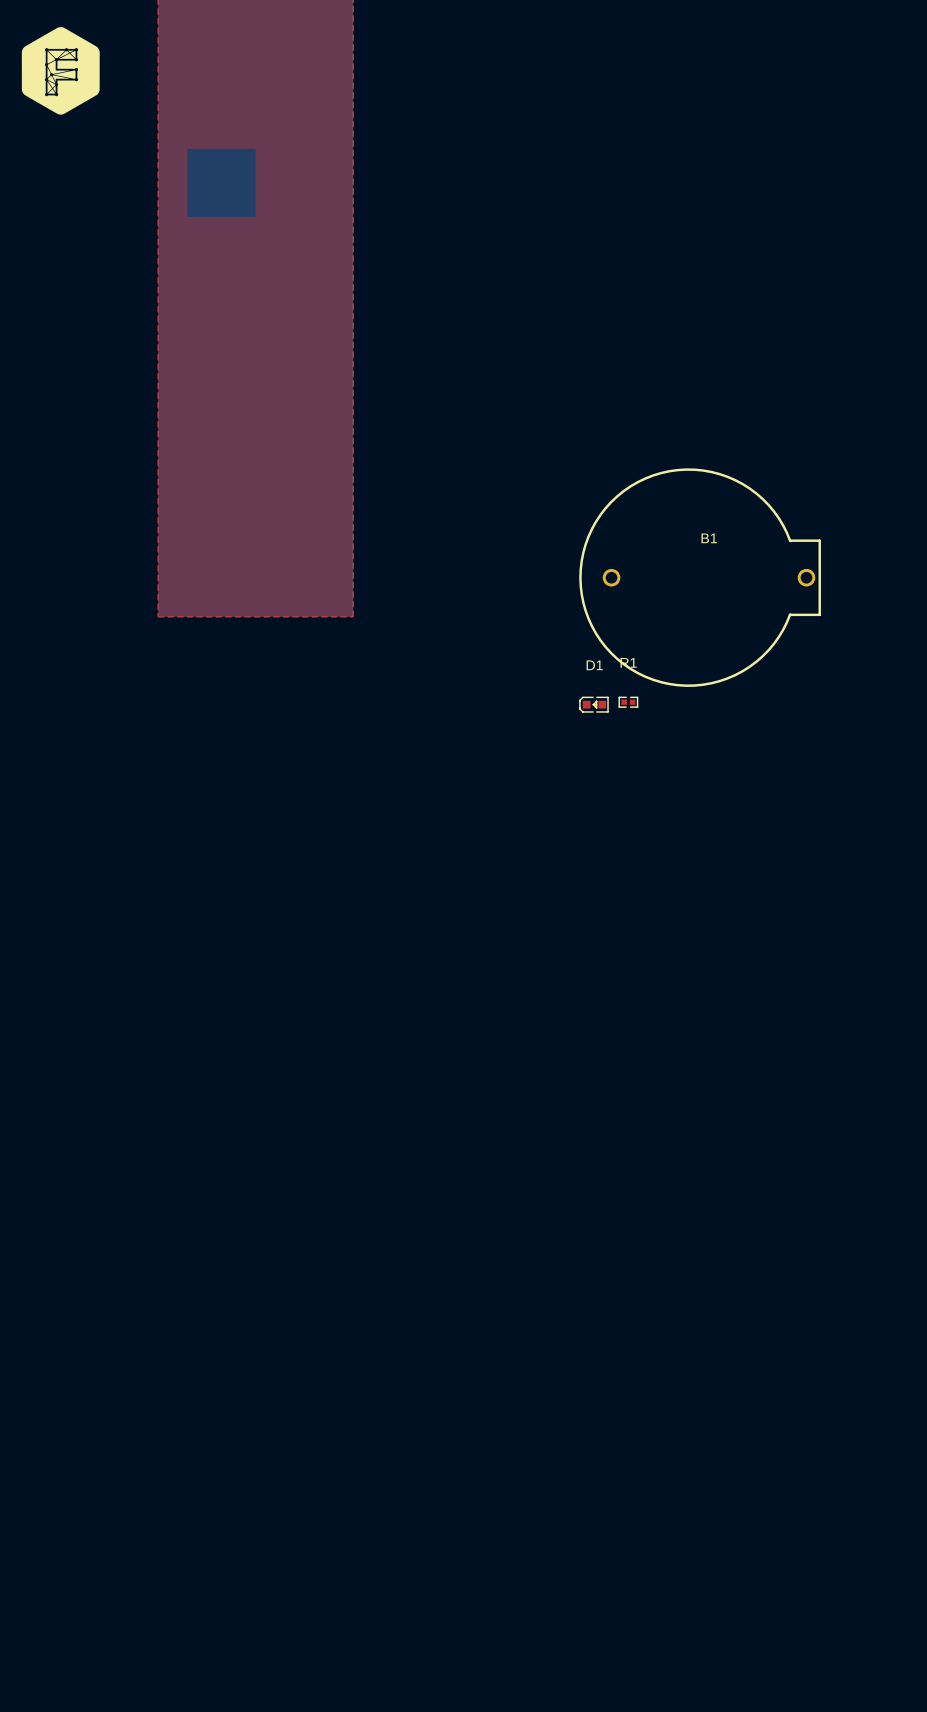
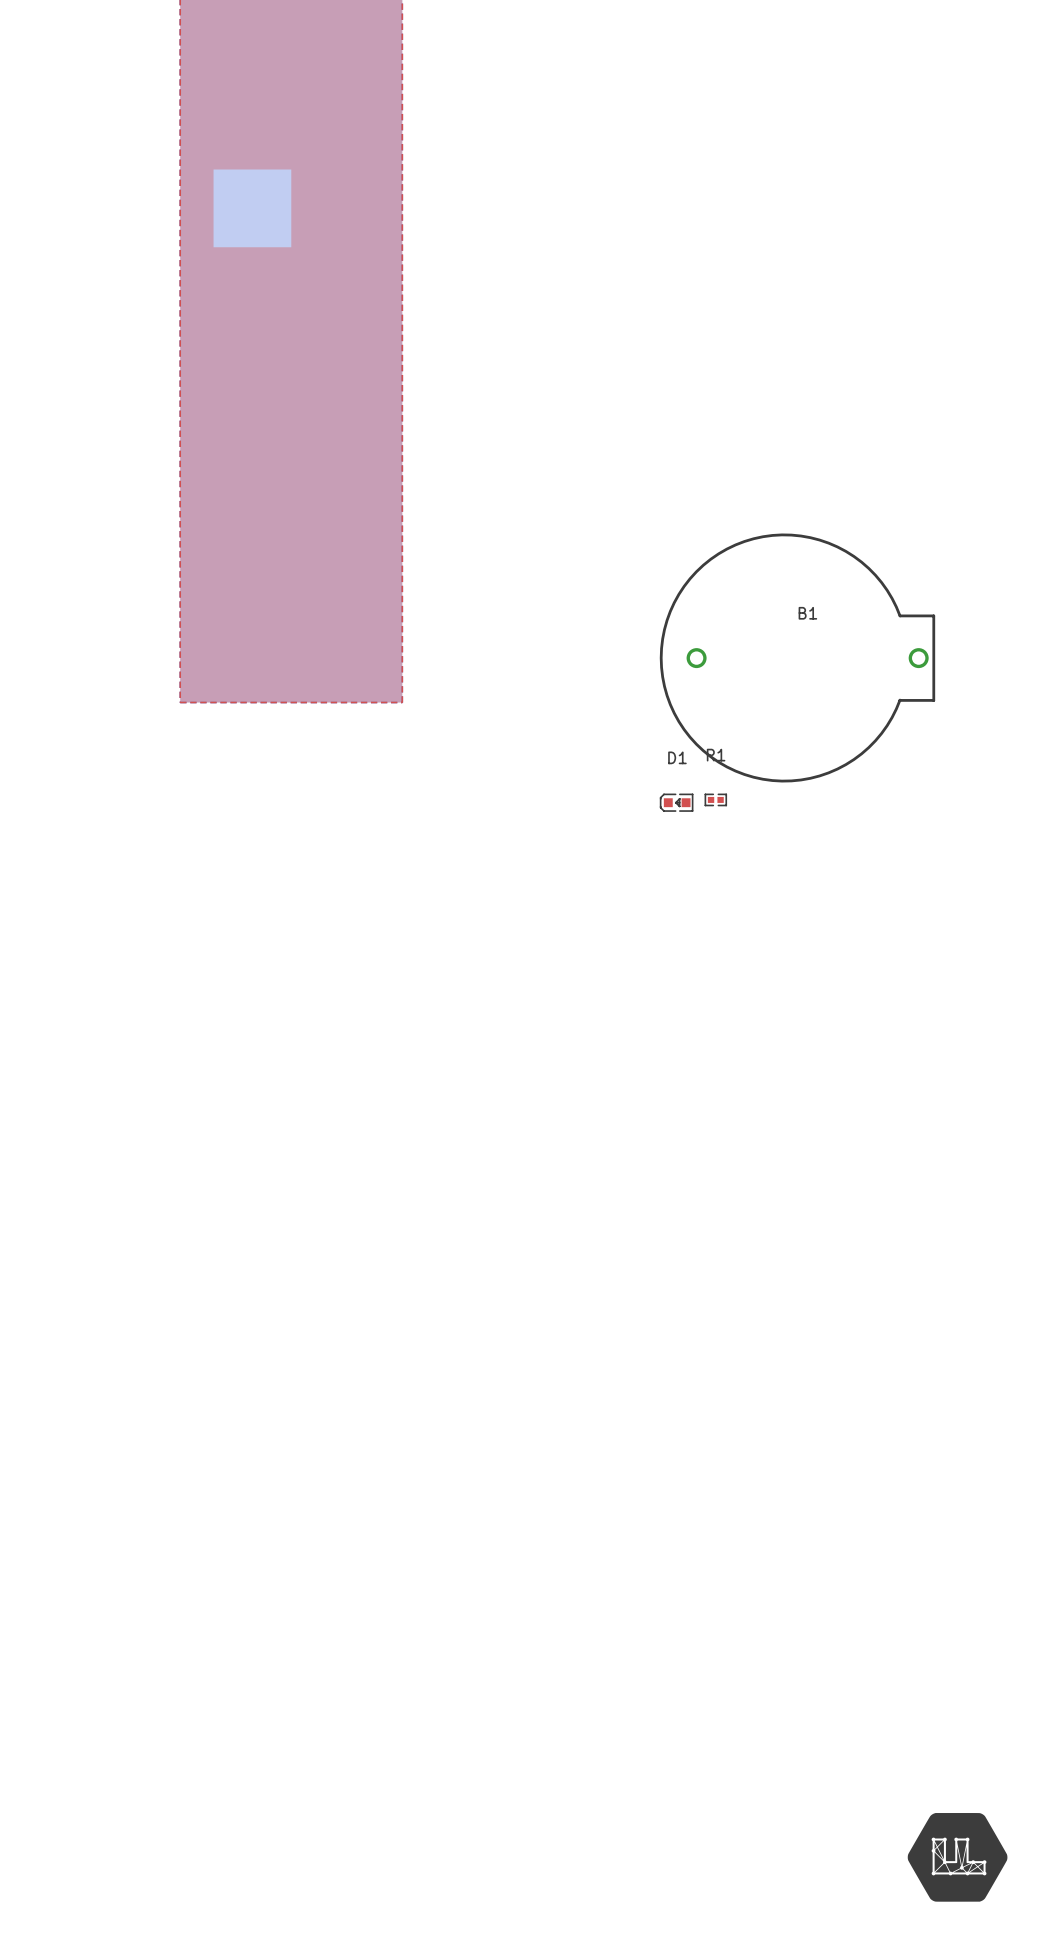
drawing: [21, 27, 100, 115] -> none
drawing: none -> [907, 1813, 1008, 1902]

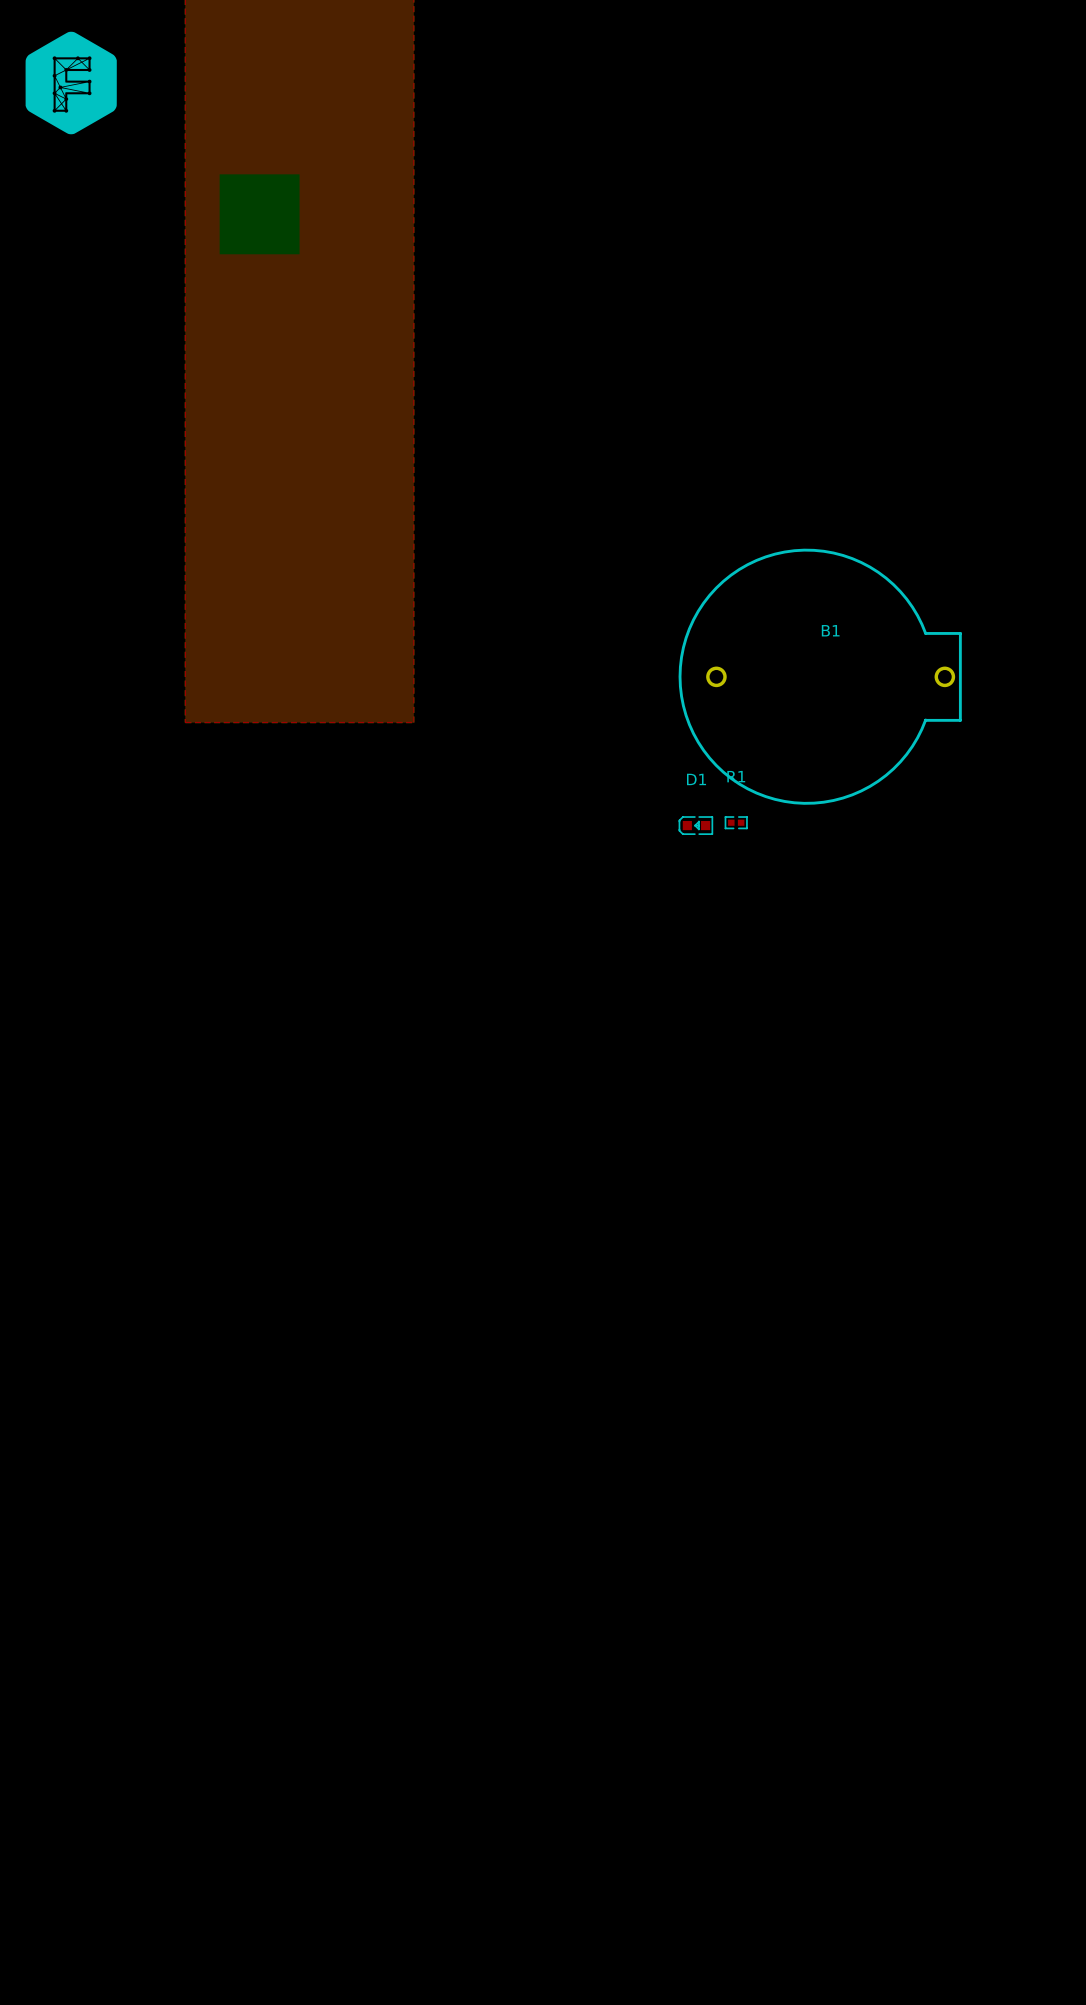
drawing: none -> [25, 31, 117, 135]
drawing: [907, 1813, 1008, 1902] -> none

